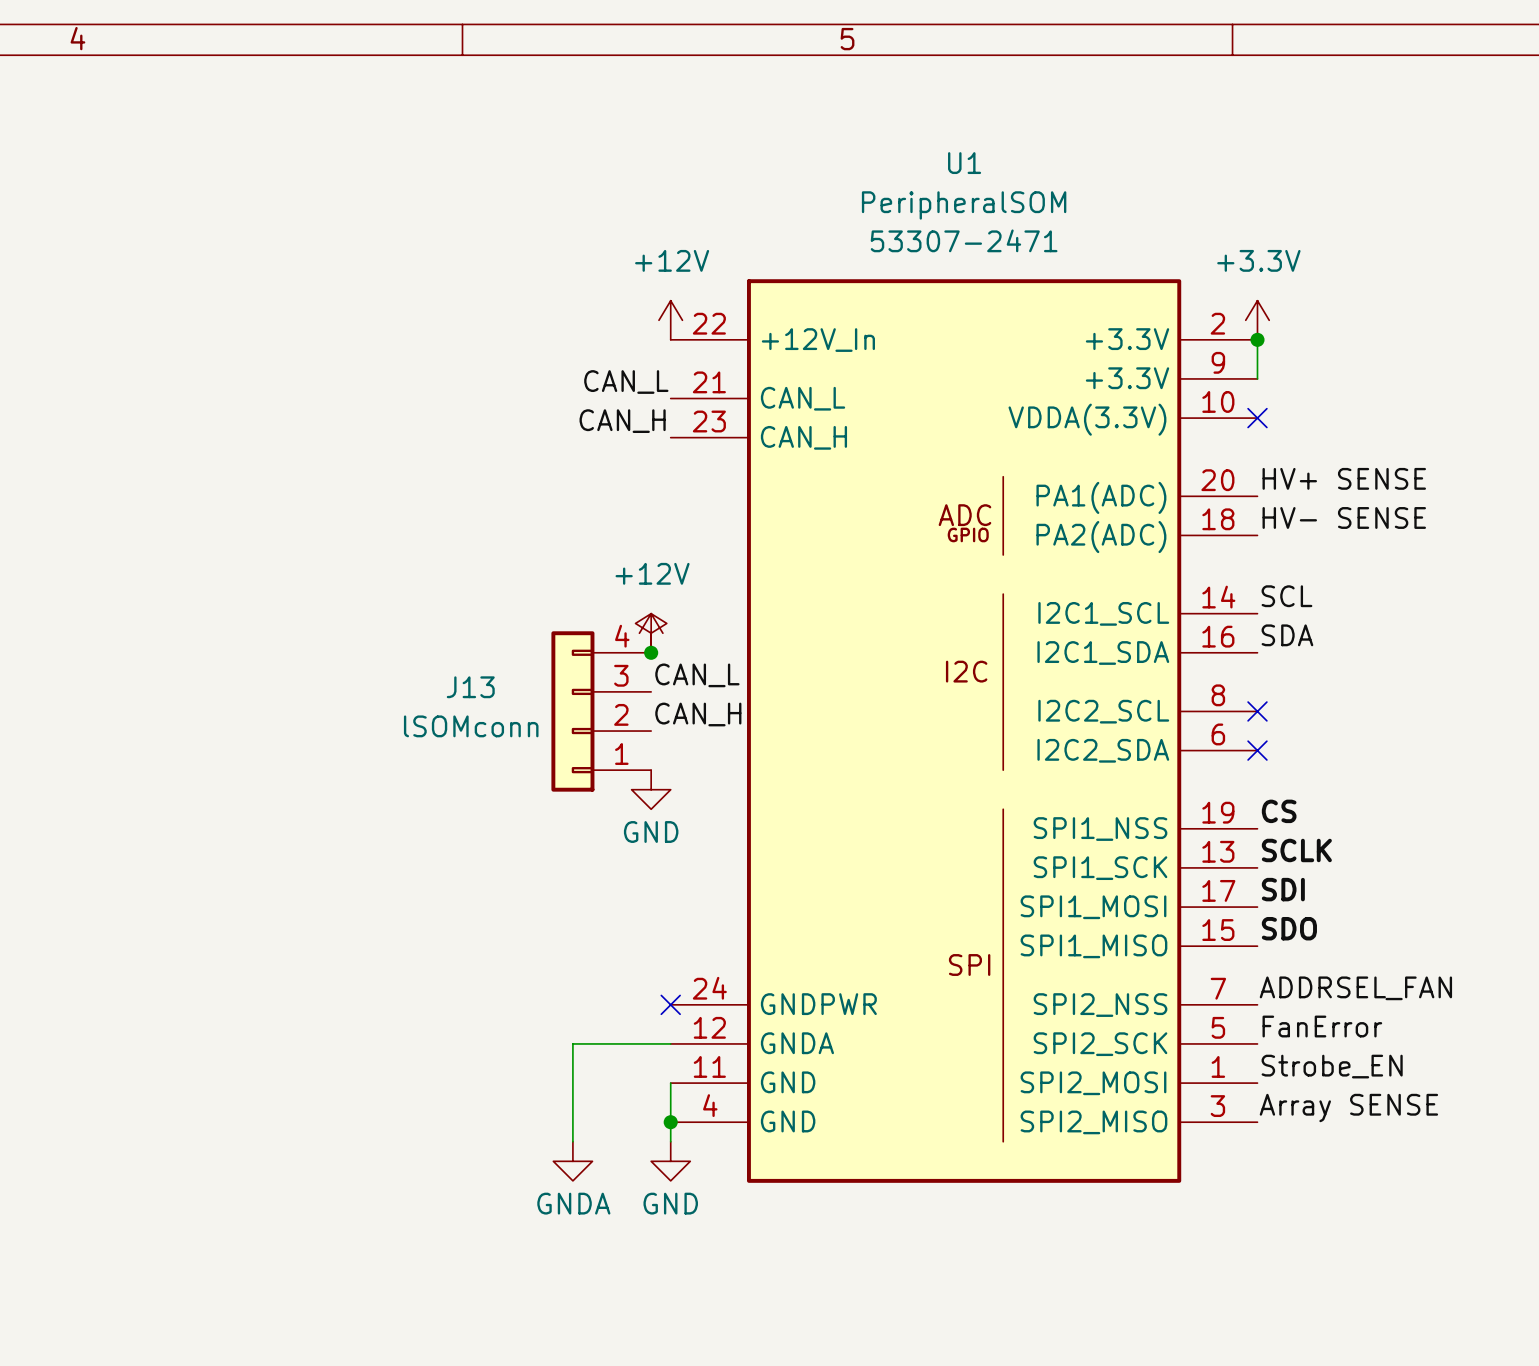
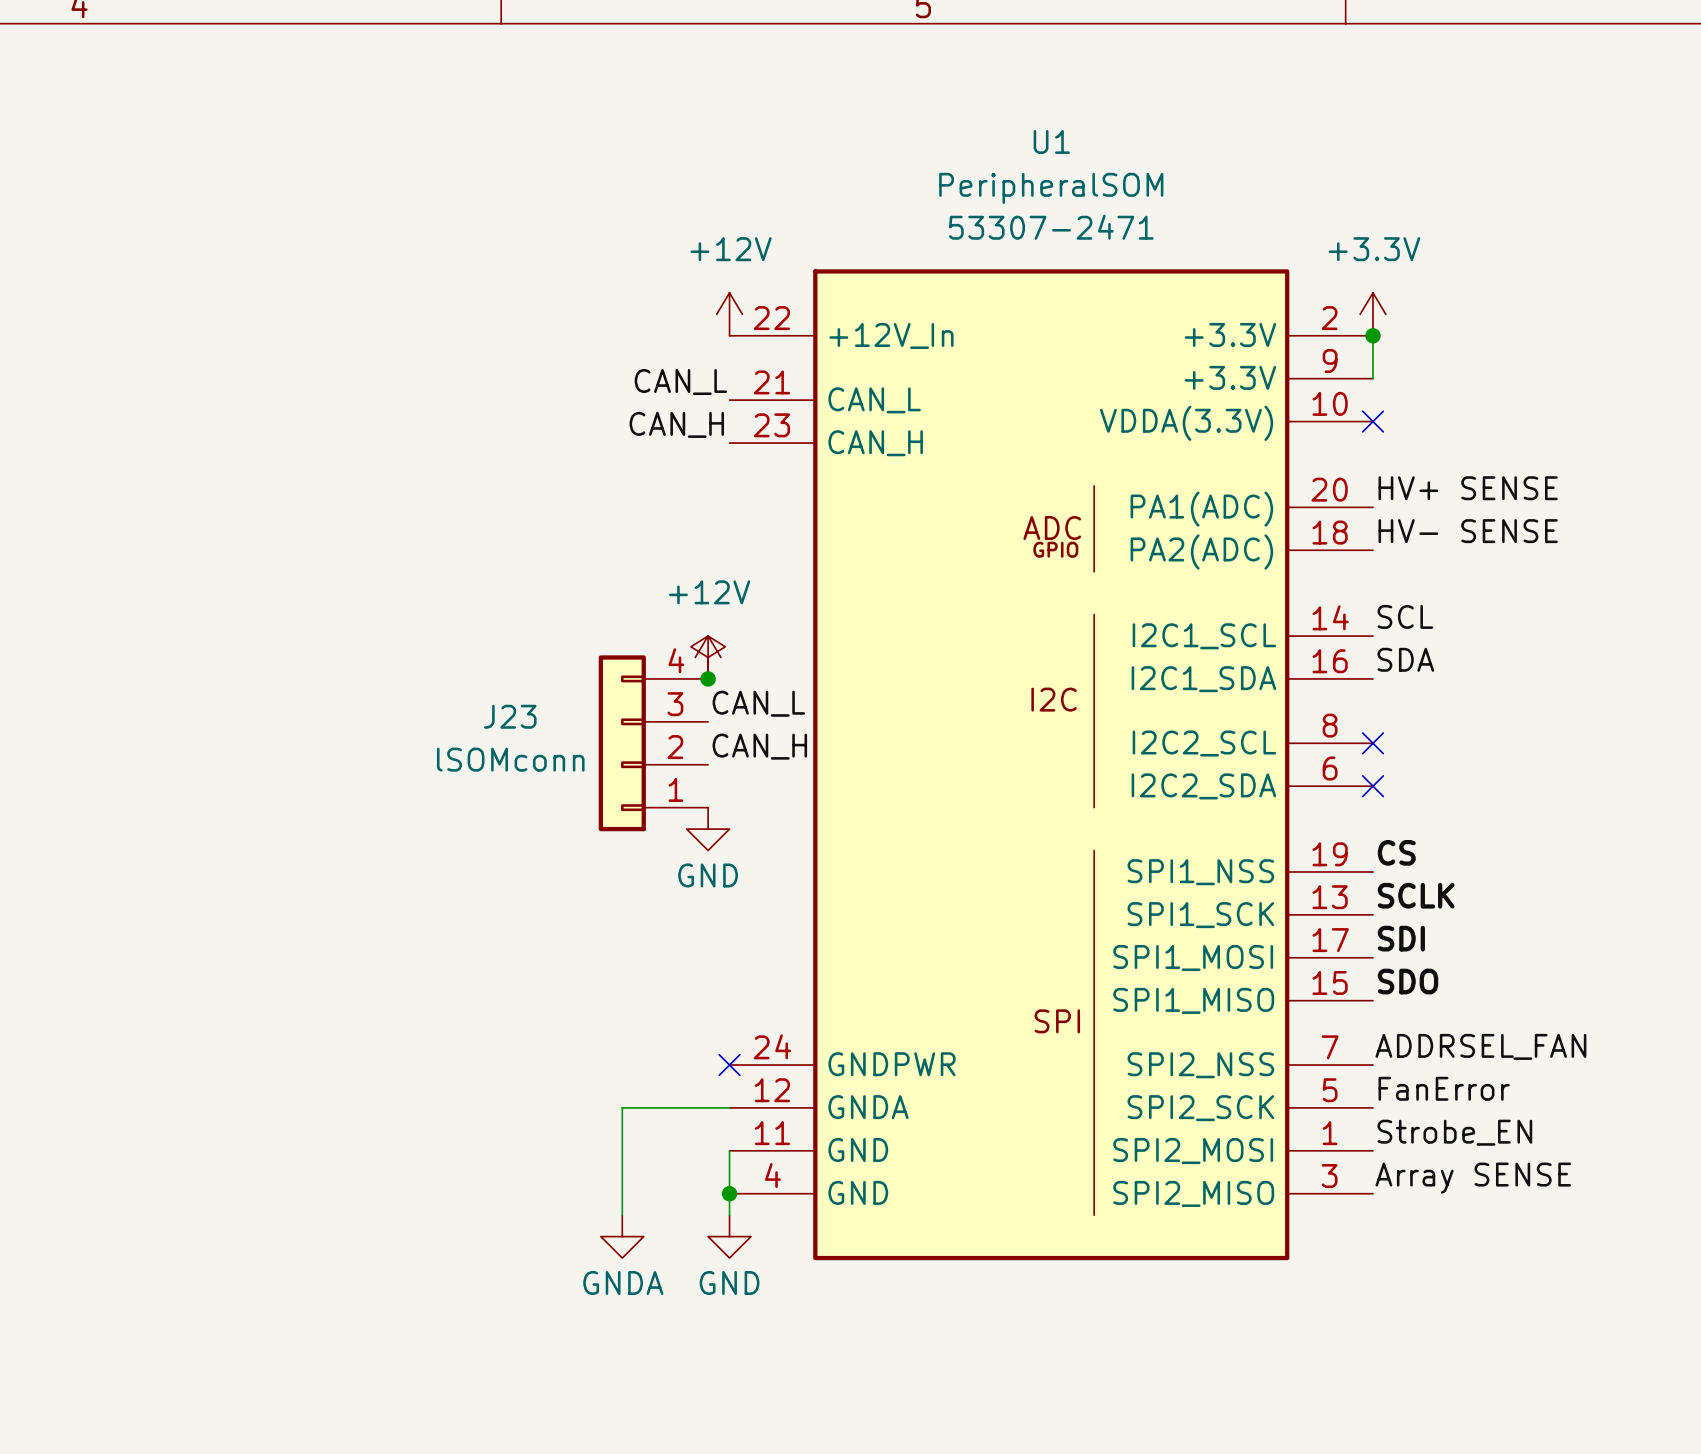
J13 name: J13 (470, 687) -> J23 (510, 716)

